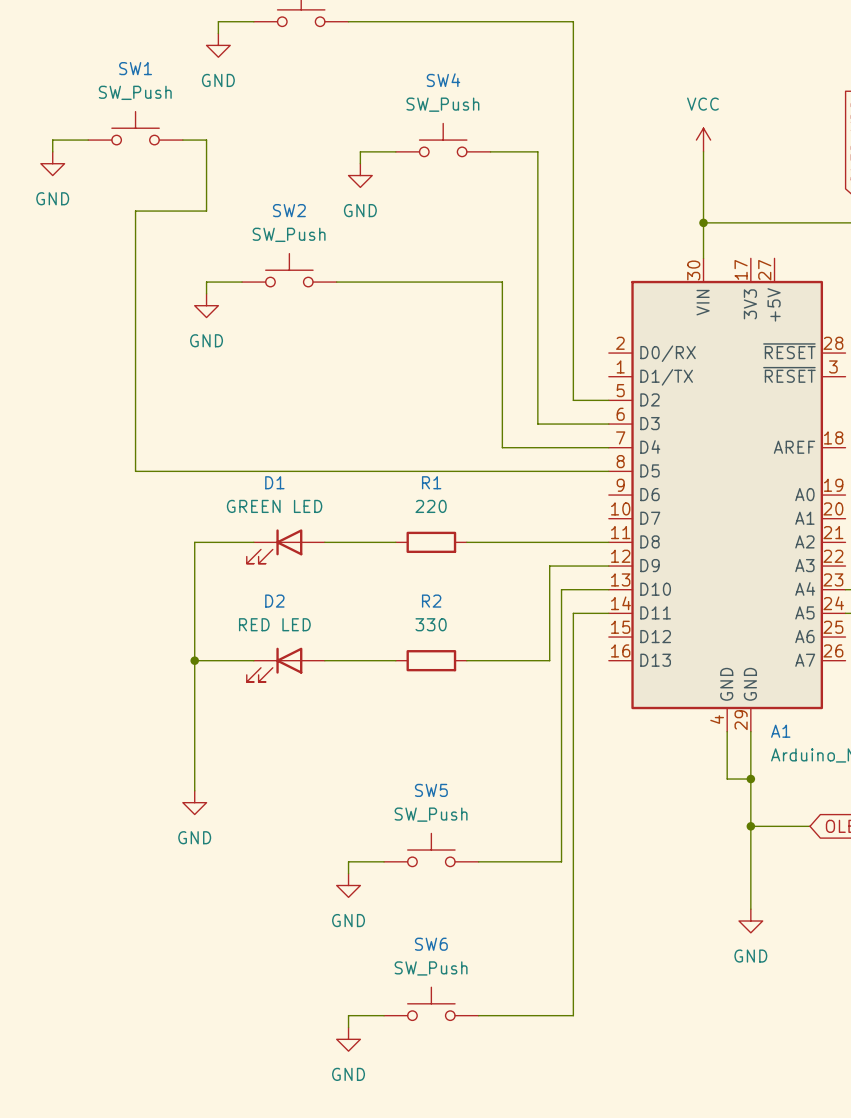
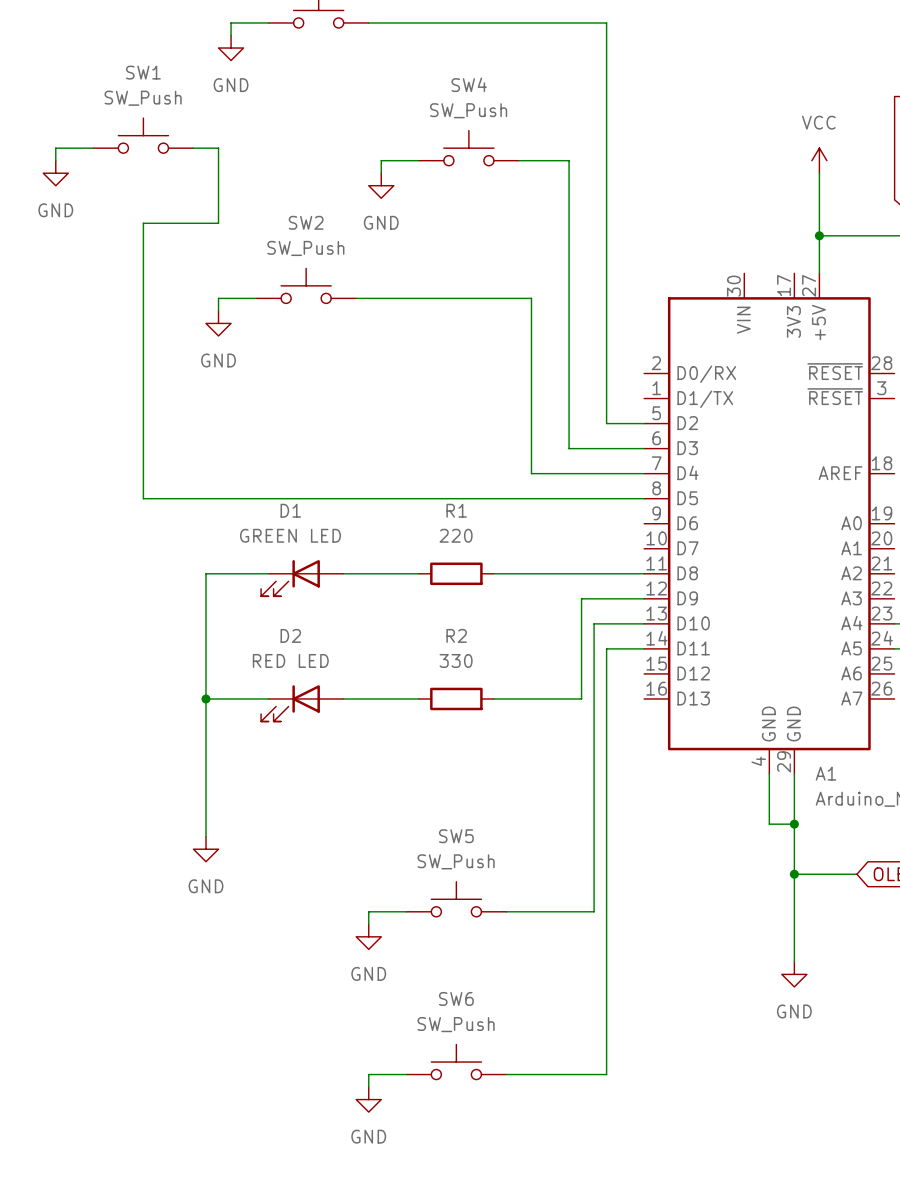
power symbol position: VCC (703, 140) -> VCC (819, 160)
wire: (703, 151) (703, 258) -> none
wire: none -> (819, 173) (819, 273)
wire: (703, 222) (774, 222) -> none
junction: (703, 222) -> none
junction: none -> (819, 235)

